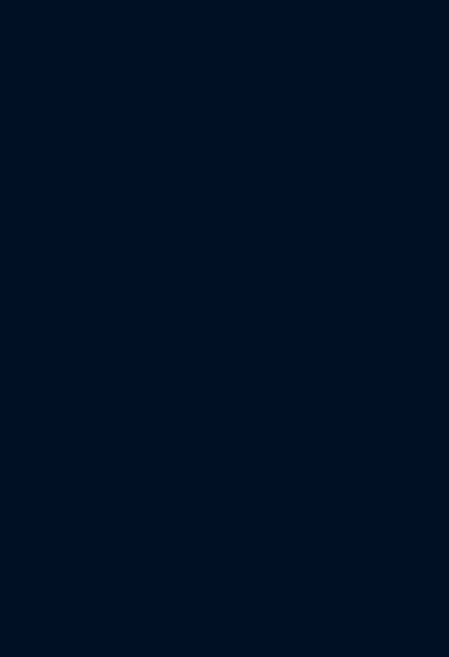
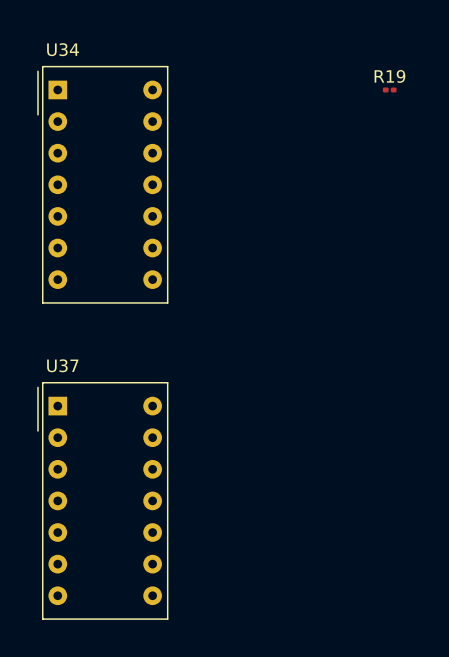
R19: none -> (389, 89)
U34: none -> (102, 184)
U37: none -> (102, 500)

